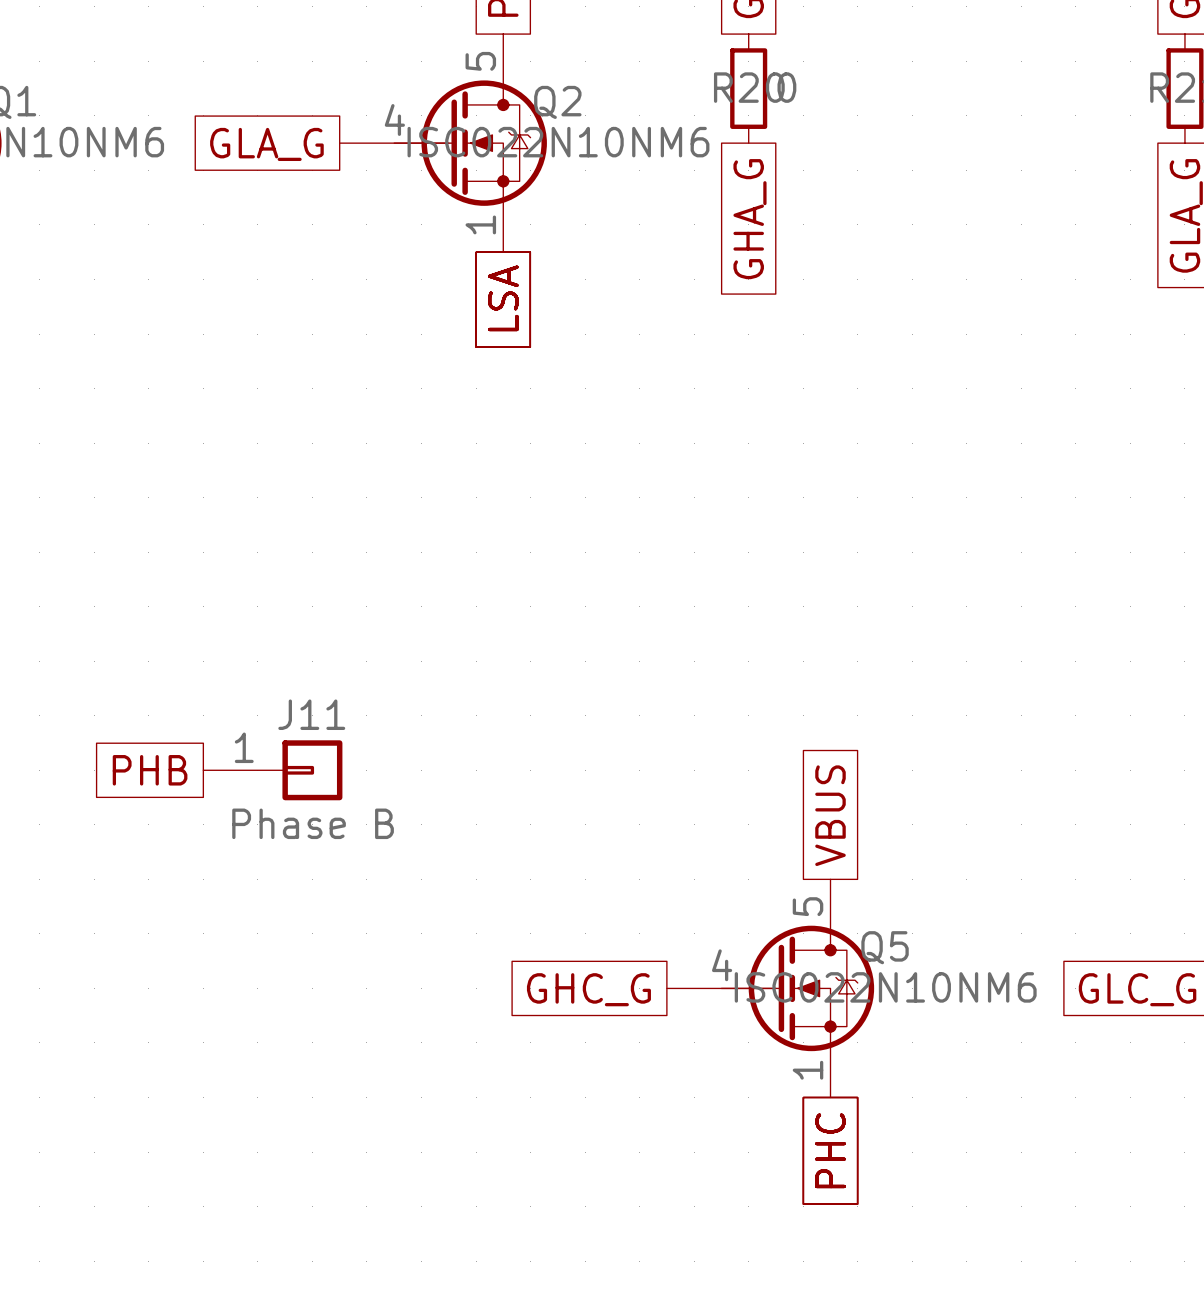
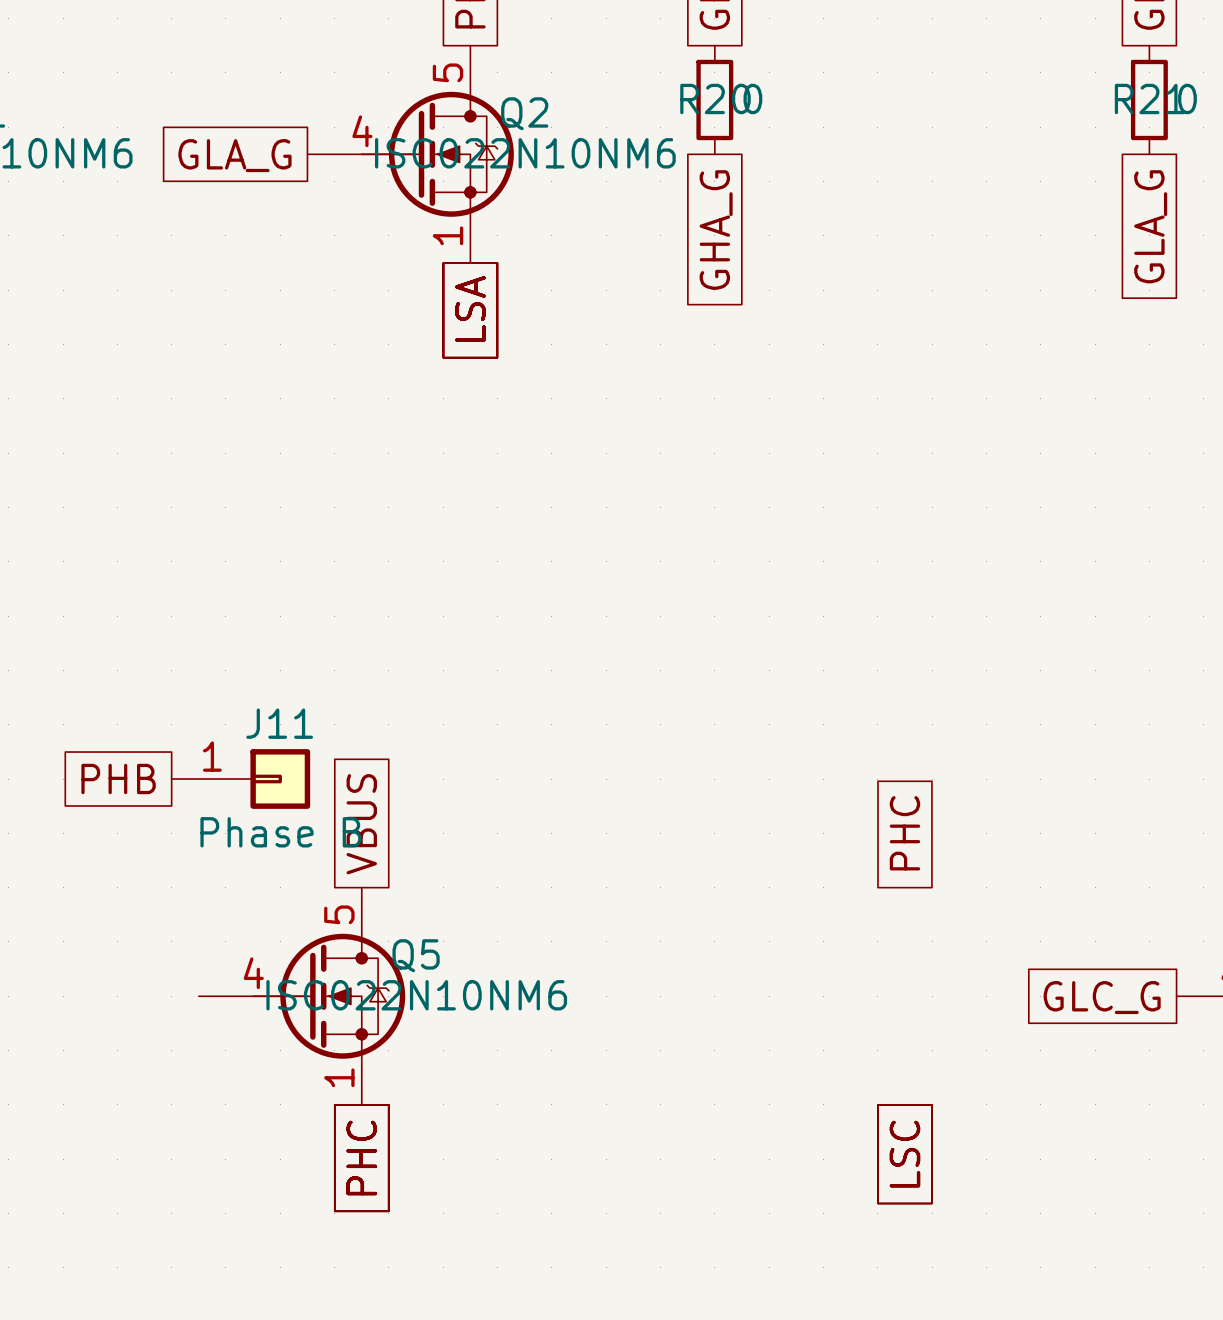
global label position: VBUS (830, 815) -> VBUS (361, 824)
global label: none -> PHC (904, 833)
Q5 position: (770, 988) -> (302, 996)
global label: GHC_G (588, 989) -> none
global label: none -> LSC (904, 1154)
global label: none -> PHC (361, 1157)
global label: PHC (830, 1150) -> none

